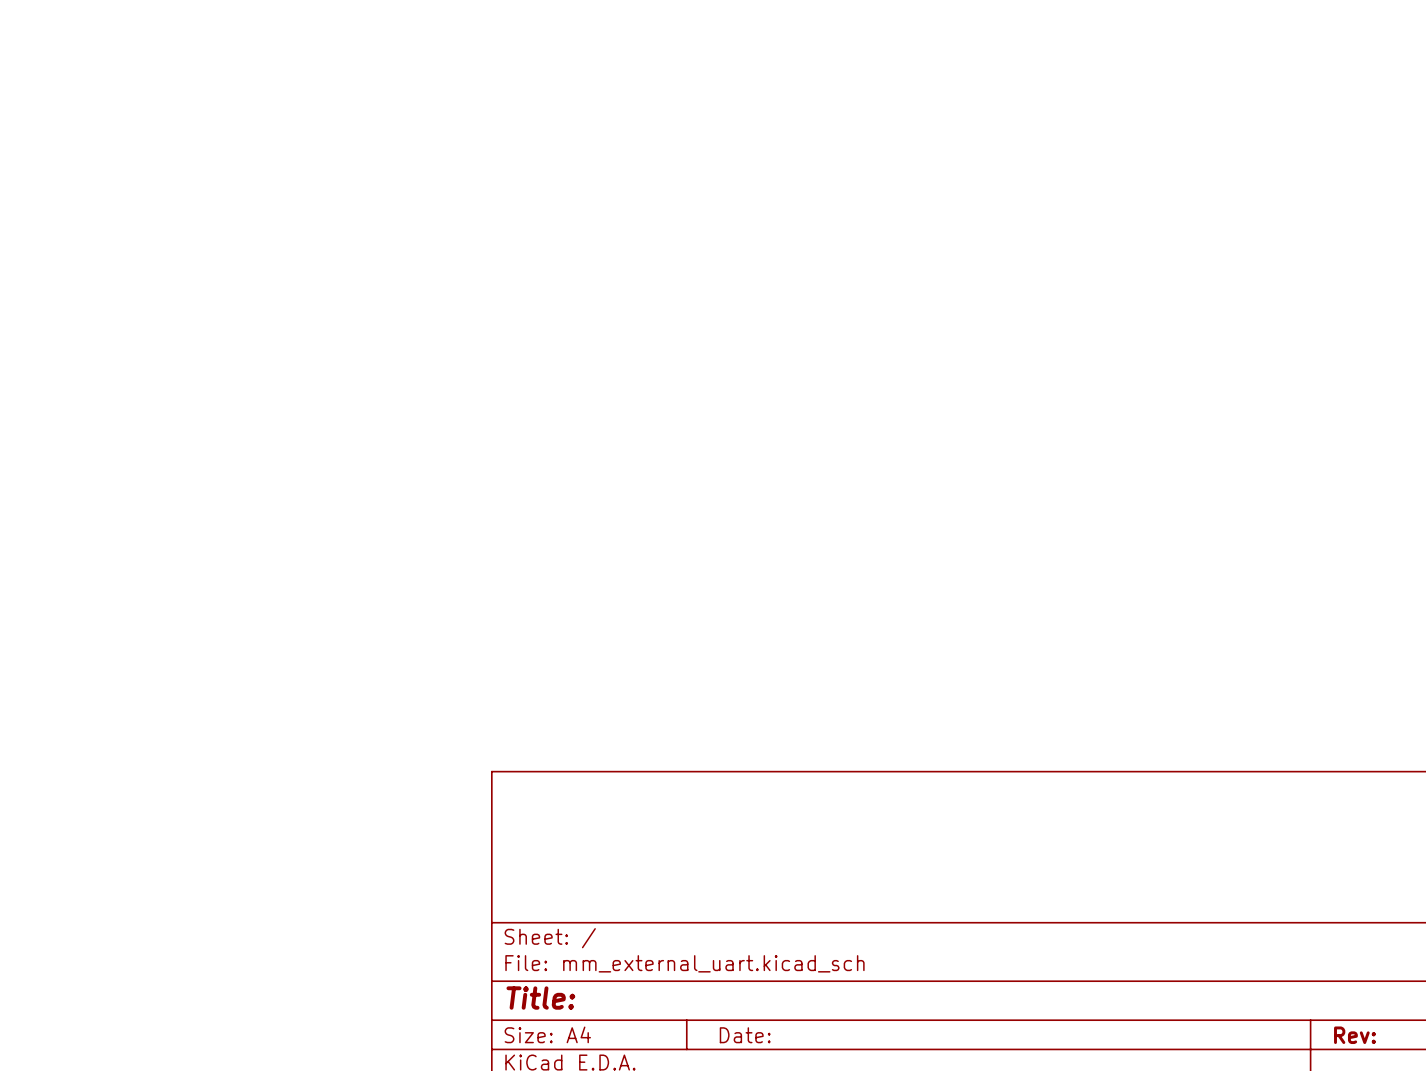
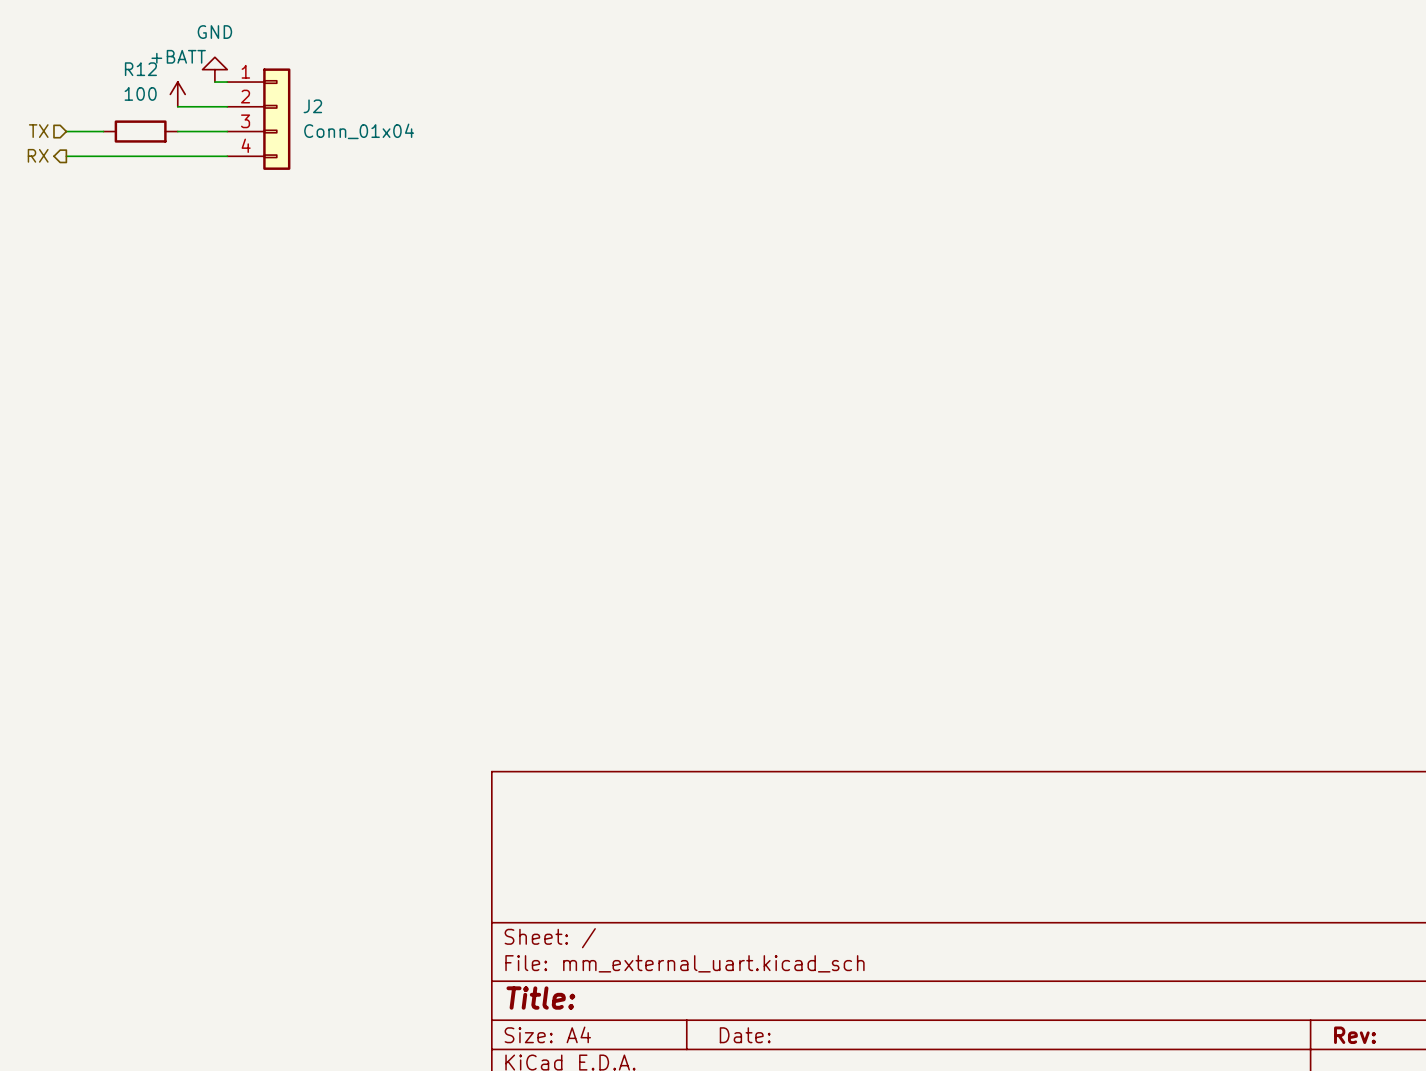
power symbol: none -> GND (214, 69)
wire: none -> (214, 82) (227, 82)
power symbol: none -> +BATT (177, 94)
wire: none -> (177, 106) (227, 106)
J2: none -> Conn_01x04 (258, 119)
hierarchical label: none -> TX (38, 131)
wire: none -> (66, 131) (103, 131)
R12: none -> 100 (140, 131)
wire: none -> (177, 131) (227, 131)
hierarchical label: none -> RX (38, 155)
wire: none -> (66, 156) (227, 156)

